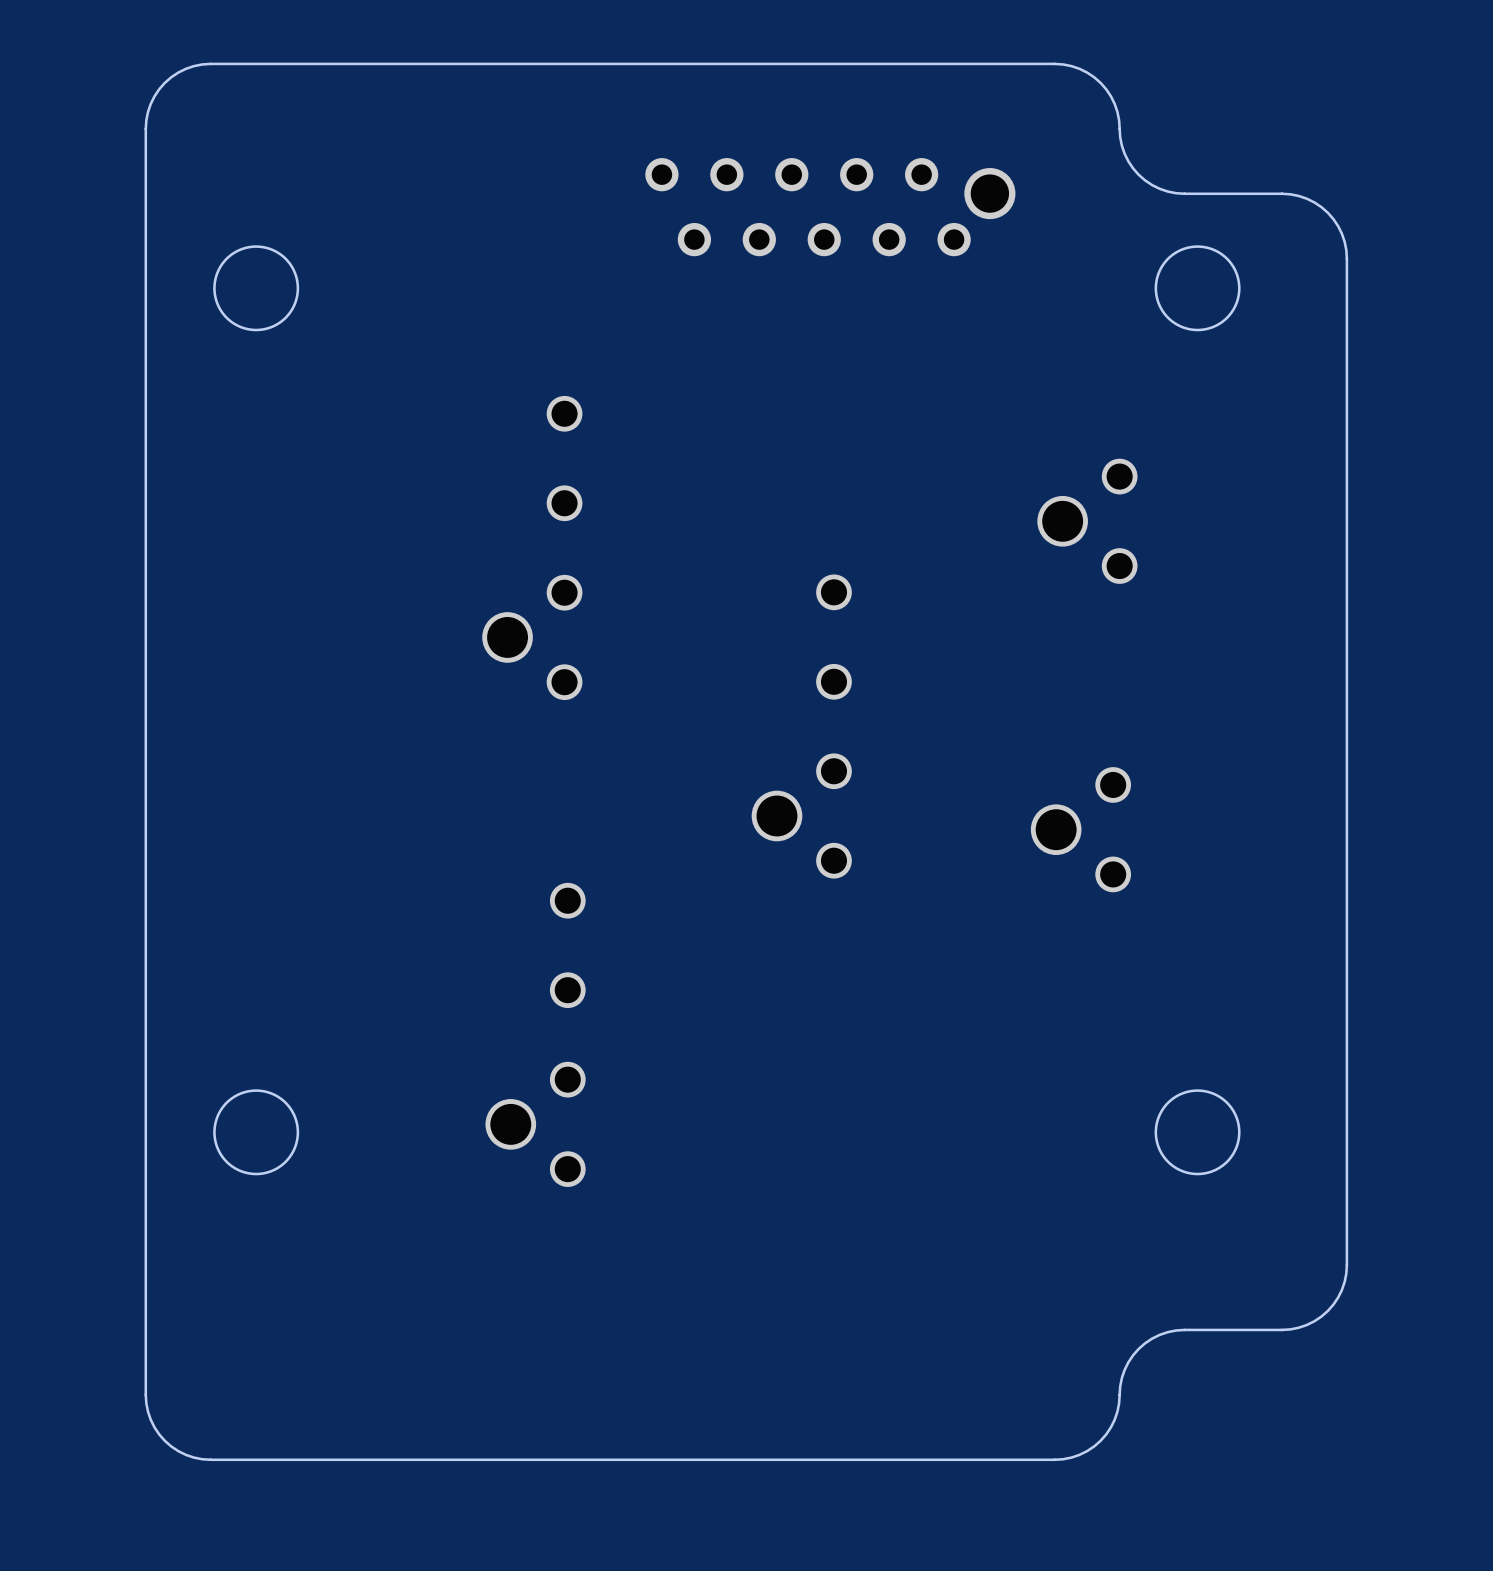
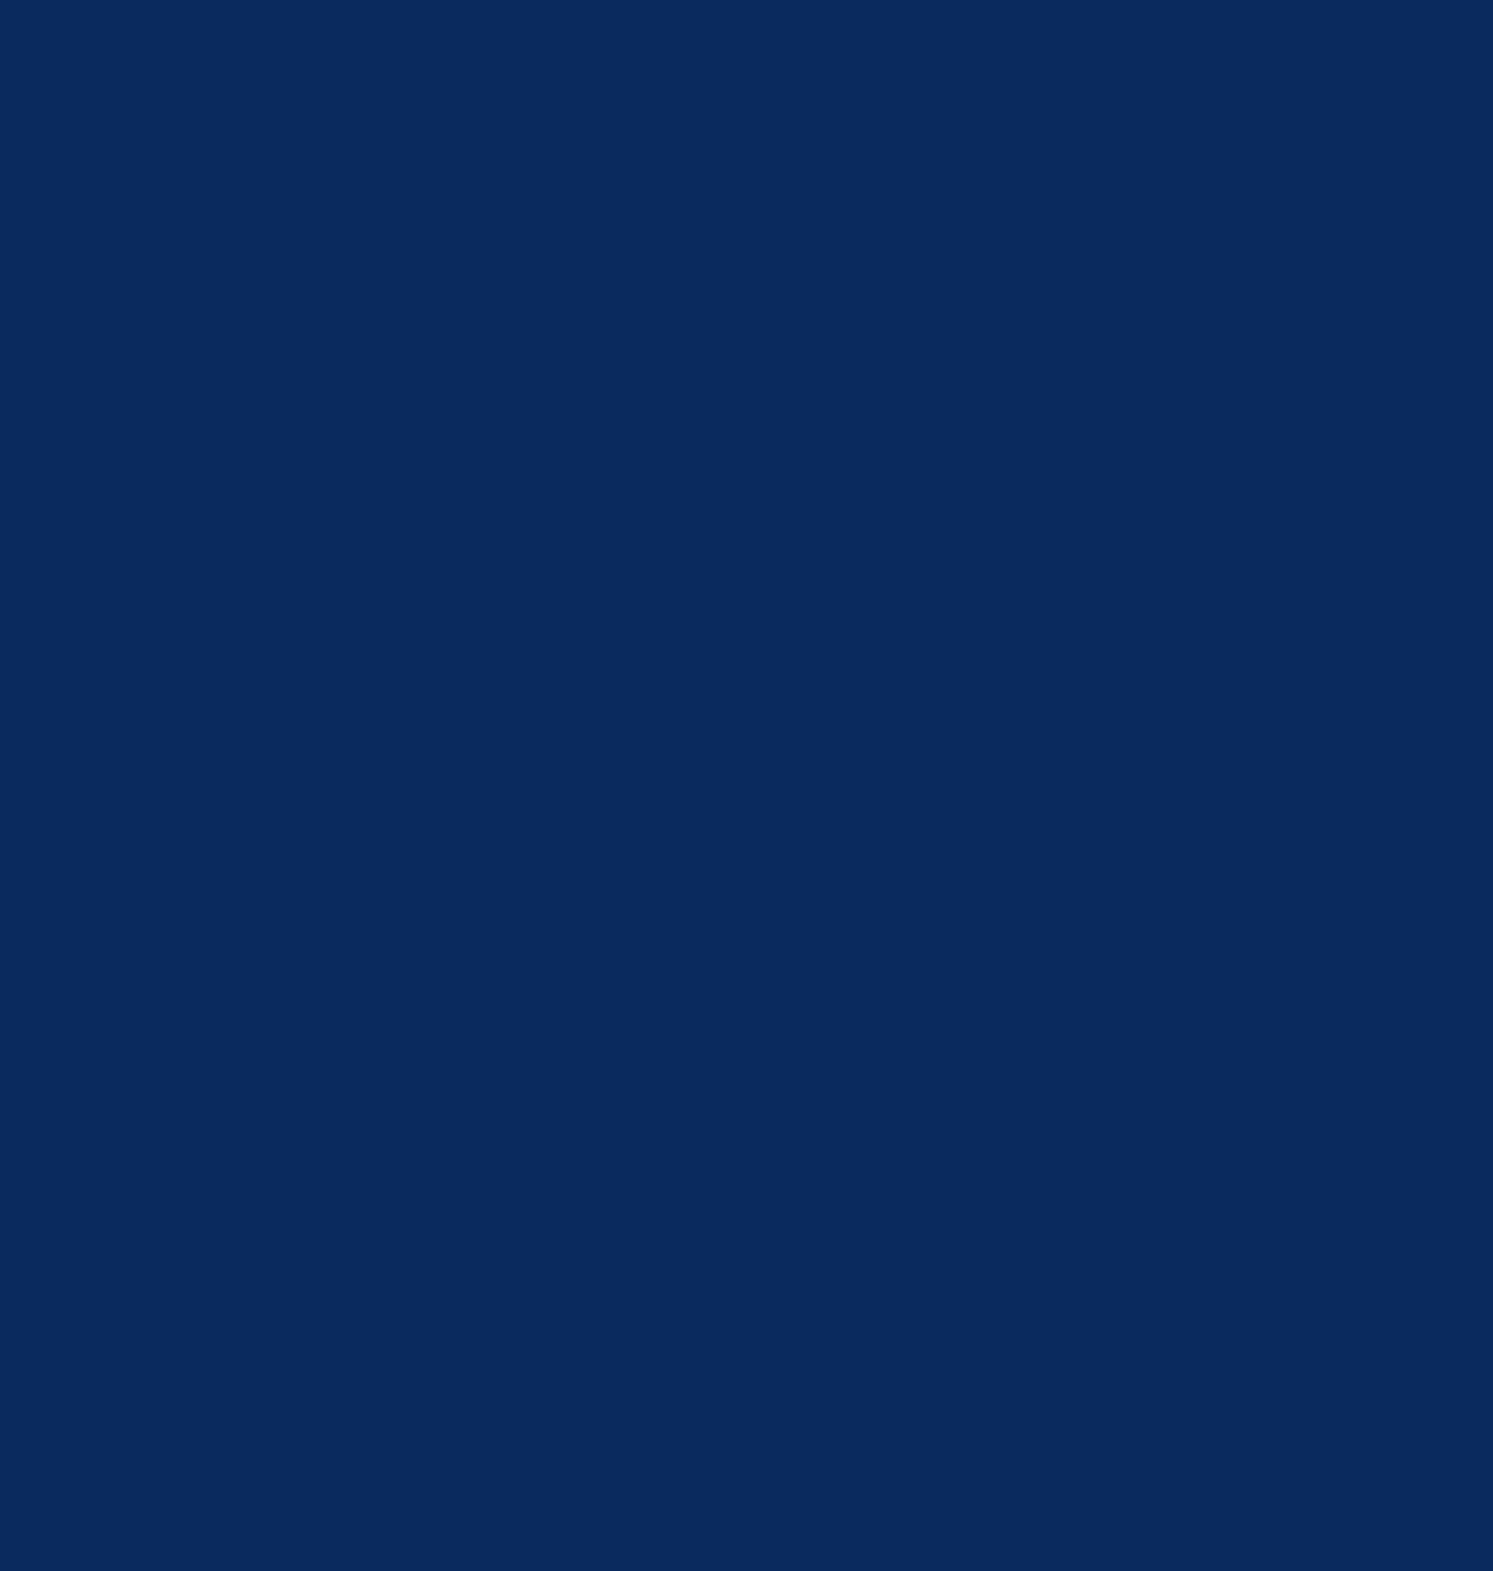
board edge: (1054, 63) (210, 63) (193, 66) (178, 72) (164, 82) (154, 96) (148, 112) (145, 128) (145, 1394) (148, 1411) (154, 1427) (164, 1440) (178, 1451) (193, 1457) (210, 1459) (1063, 1459) (1087, 1451) (1106, 1434) (1117, 1411) (1120, 1386) (1124, 1370) (1133, 1355) (1152, 1338) (1176, 1330) (1281, 1329) (1298, 1327) (1321, 1316) (1338, 1297) (1344, 1281) (1346, 1265) (1346, 258) (1344, 241) (1338, 226) (1327, 212) (1314, 202) (1298, 195) (1281, 193) (1176, 193) (1152, 185) (1133, 168) (1124, 153) (1120, 137) (1117, 112) (1106, 89) (1094, 77) (1079, 68) (1054, 63) -> none
part: (830, 207) -> none
round board edge: [213, 245, 300, 332] -> none
round board edge: [1154, 245, 1241, 332] -> none
part: (1087, 521) -> none
part: (532, 547) -> none
part: (801, 726) -> none
part: (1080, 829) -> none
part: (535, 1034) -> none
round board edge: [213, 1089, 300, 1176] -> none
round board edge: [1154, 1089, 1241, 1176] -> none

